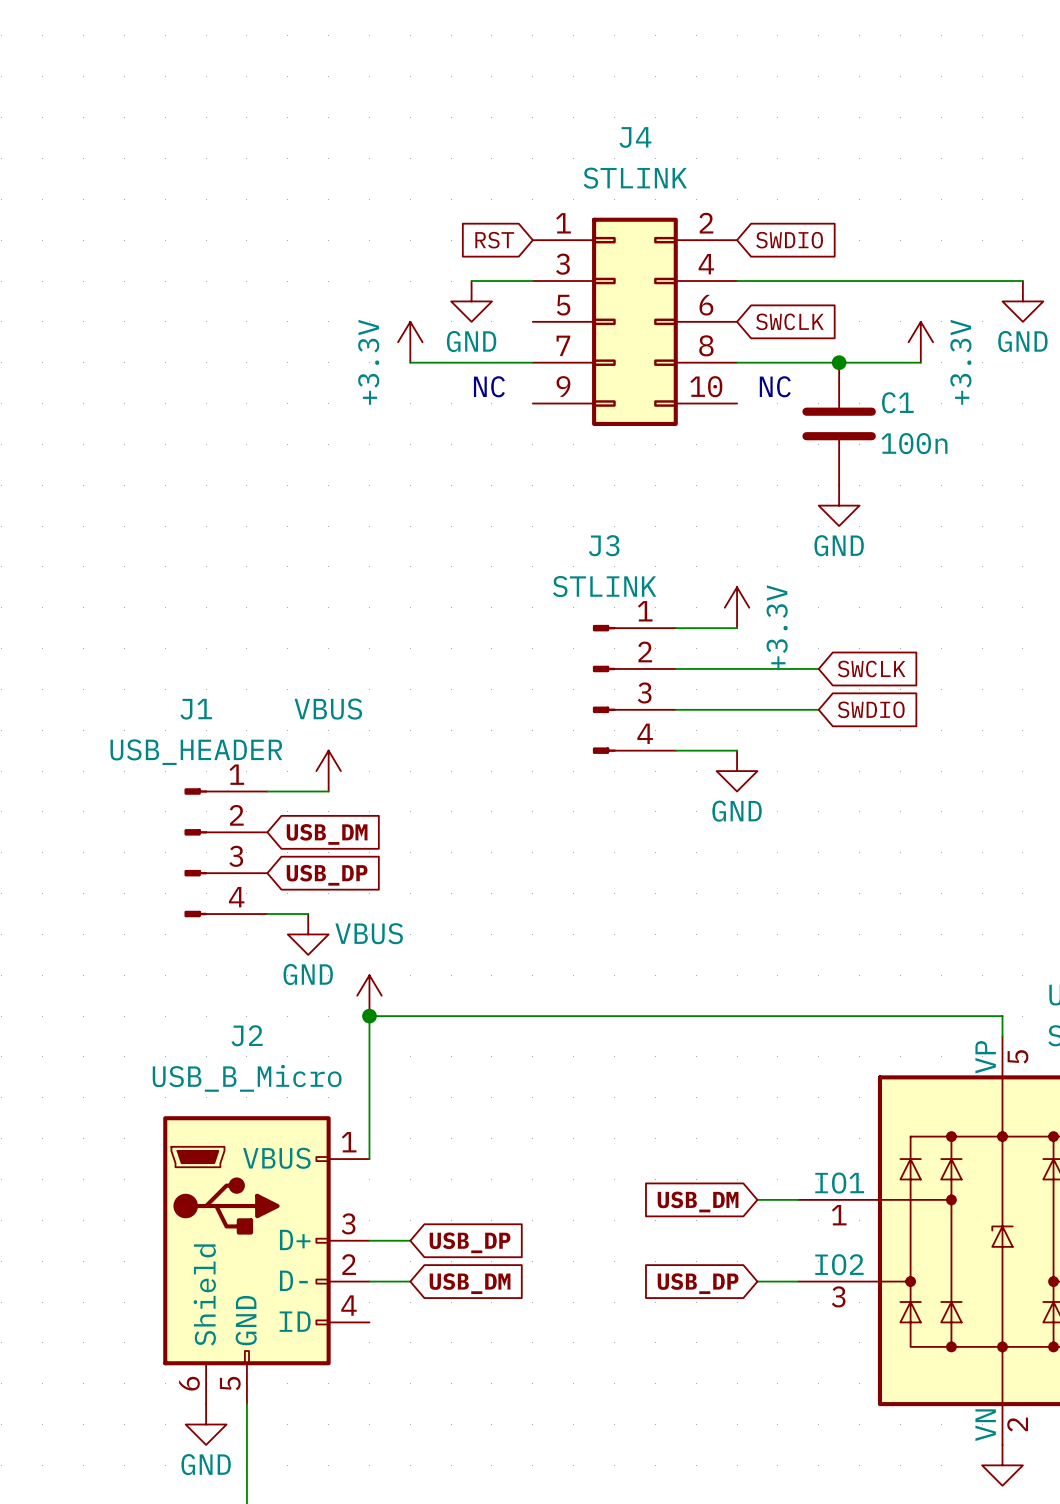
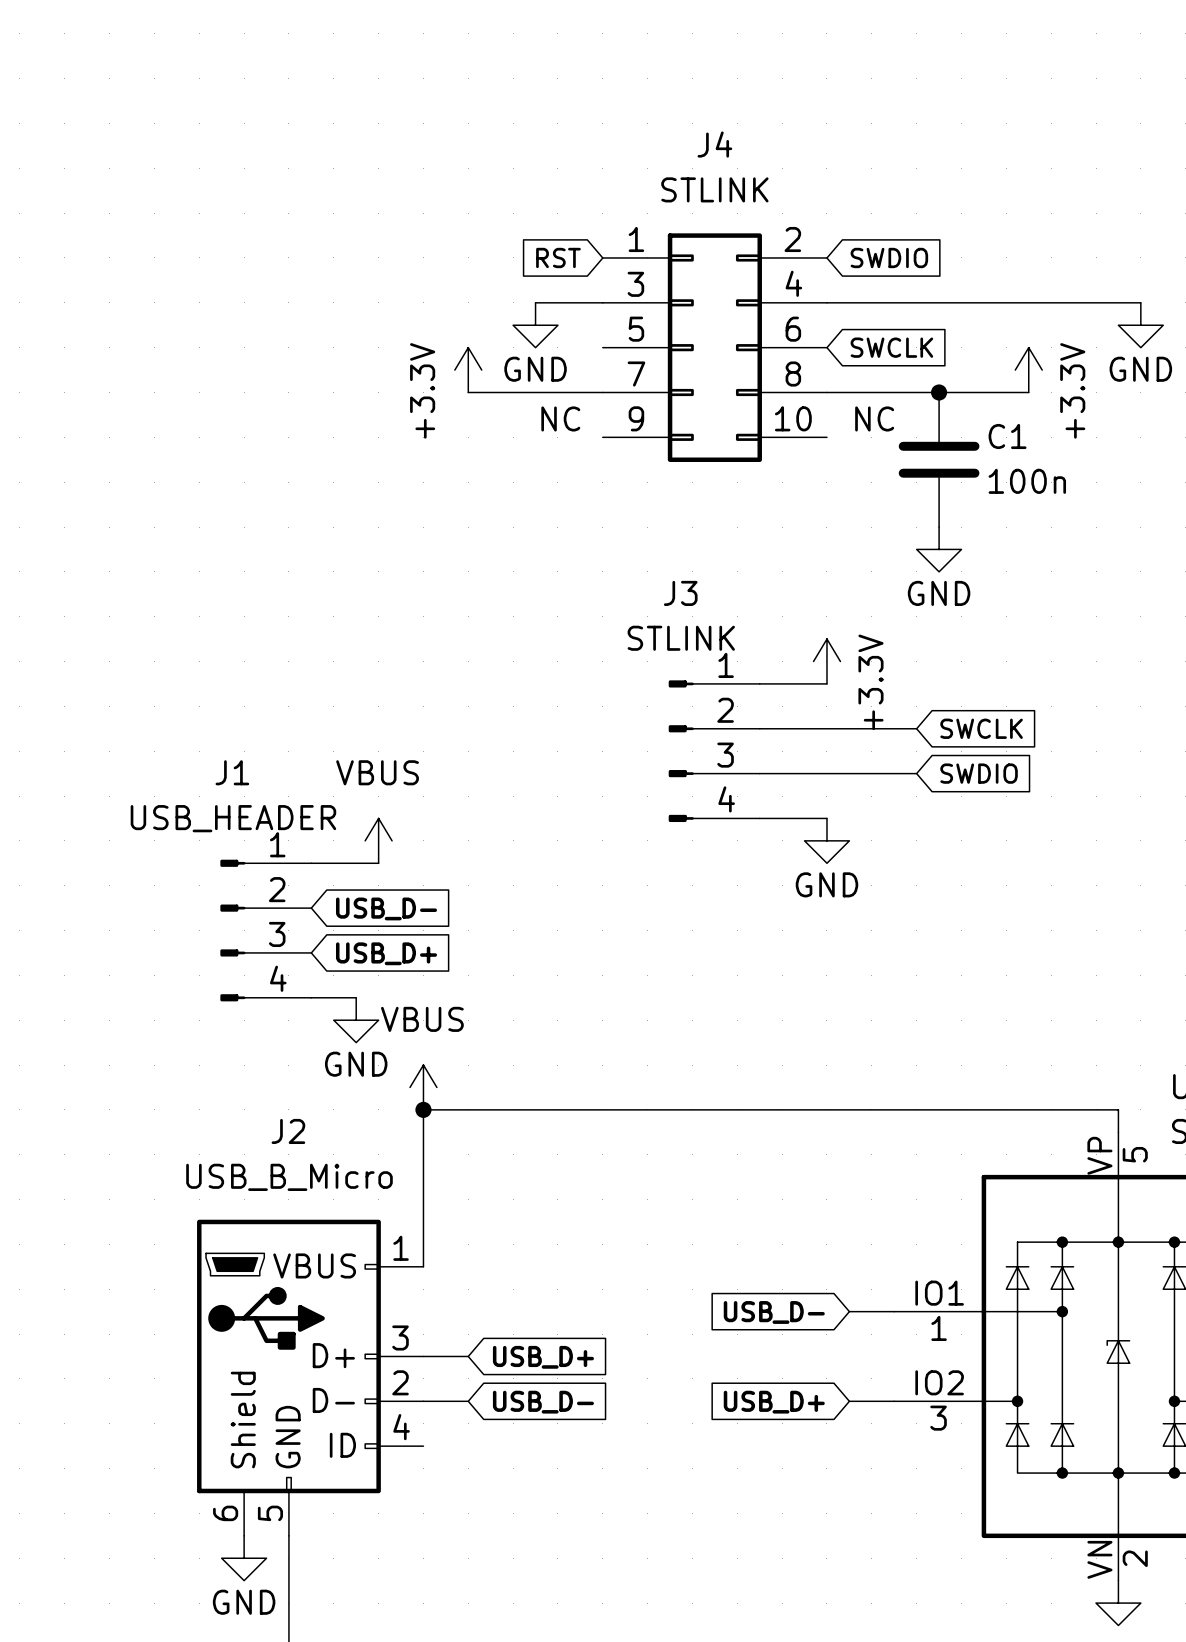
global label: USB_DM (327, 834) -> USB_D- (386, 908)
global label: USB_DP (327, 875) -> USB_D+ (386, 953)
global label: USB_DM (698, 1201) -> USB_D- (774, 1312)
global label: USB_DP (470, 1242) -> USB_D+ (543, 1357)
global label: USB_DM (470, 1283) -> USB_D- (543, 1402)
global label: USB_DP (698, 1283) -> USB_D+ (774, 1402)

